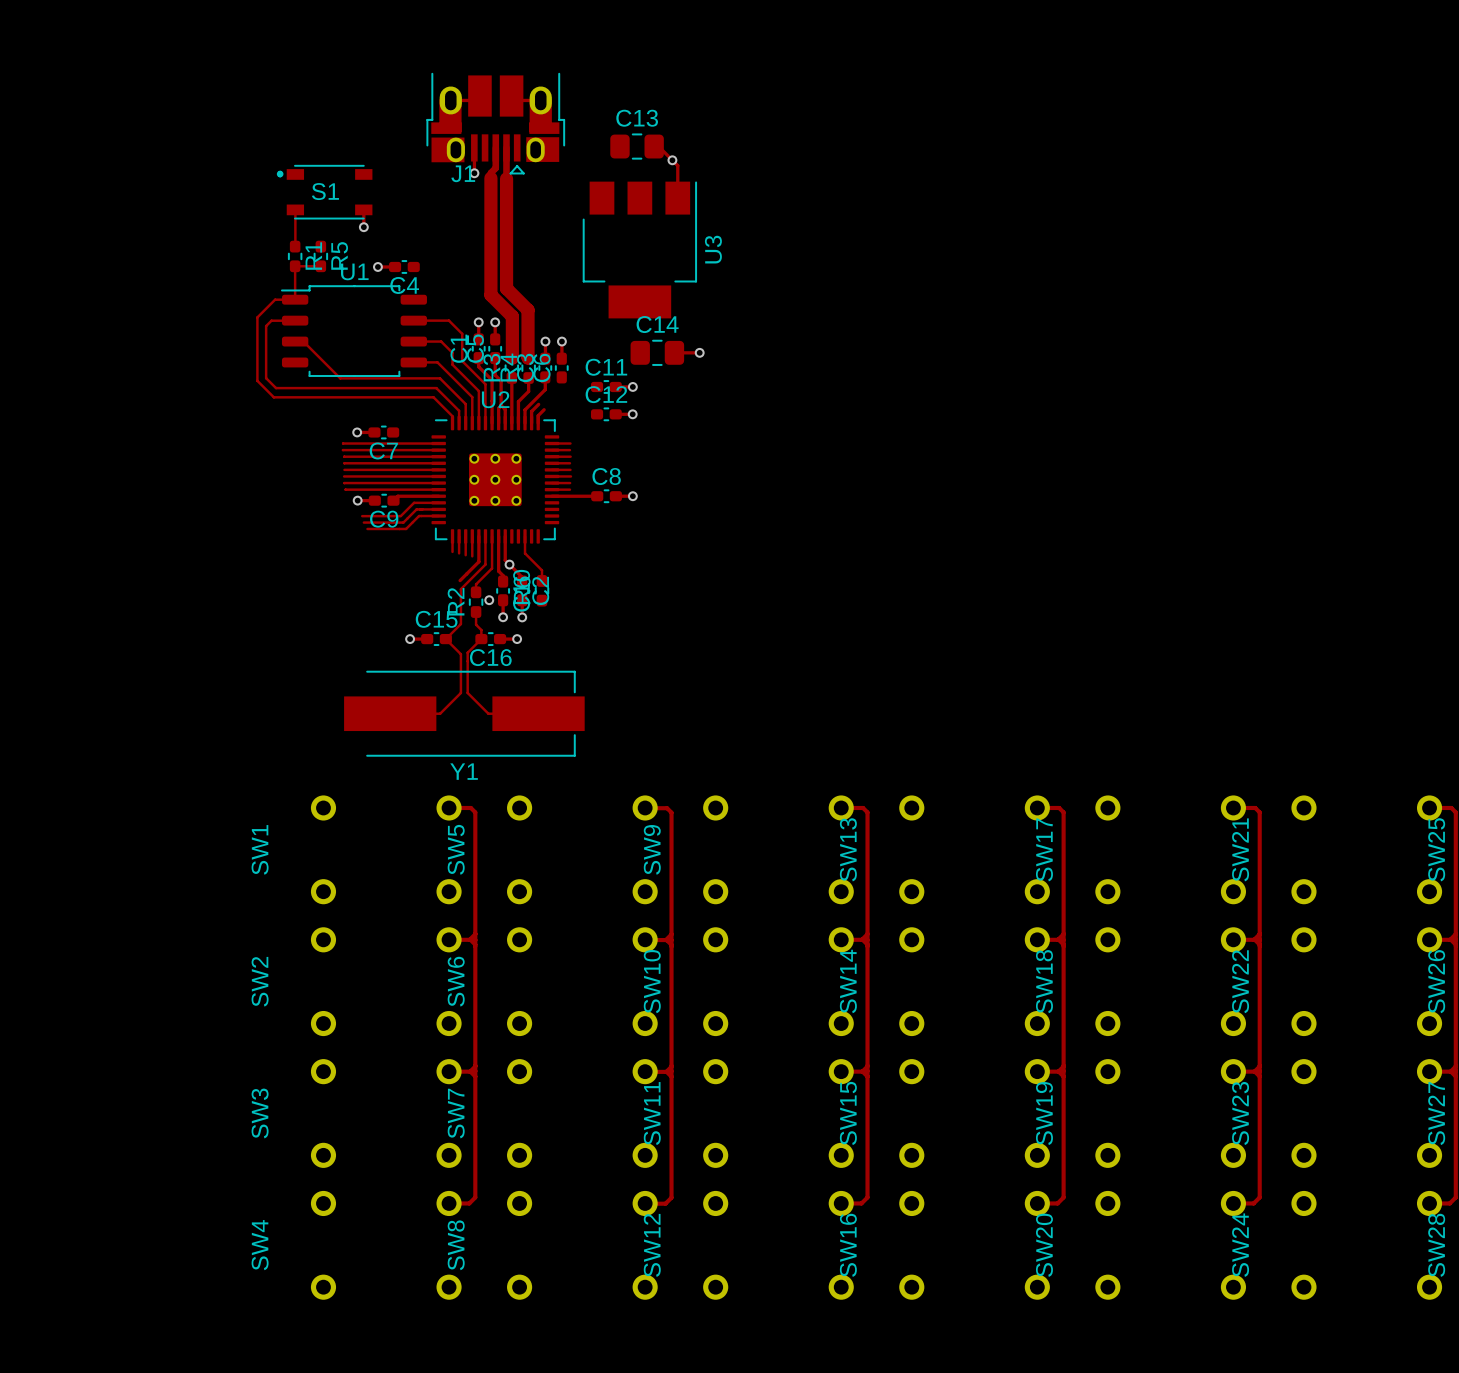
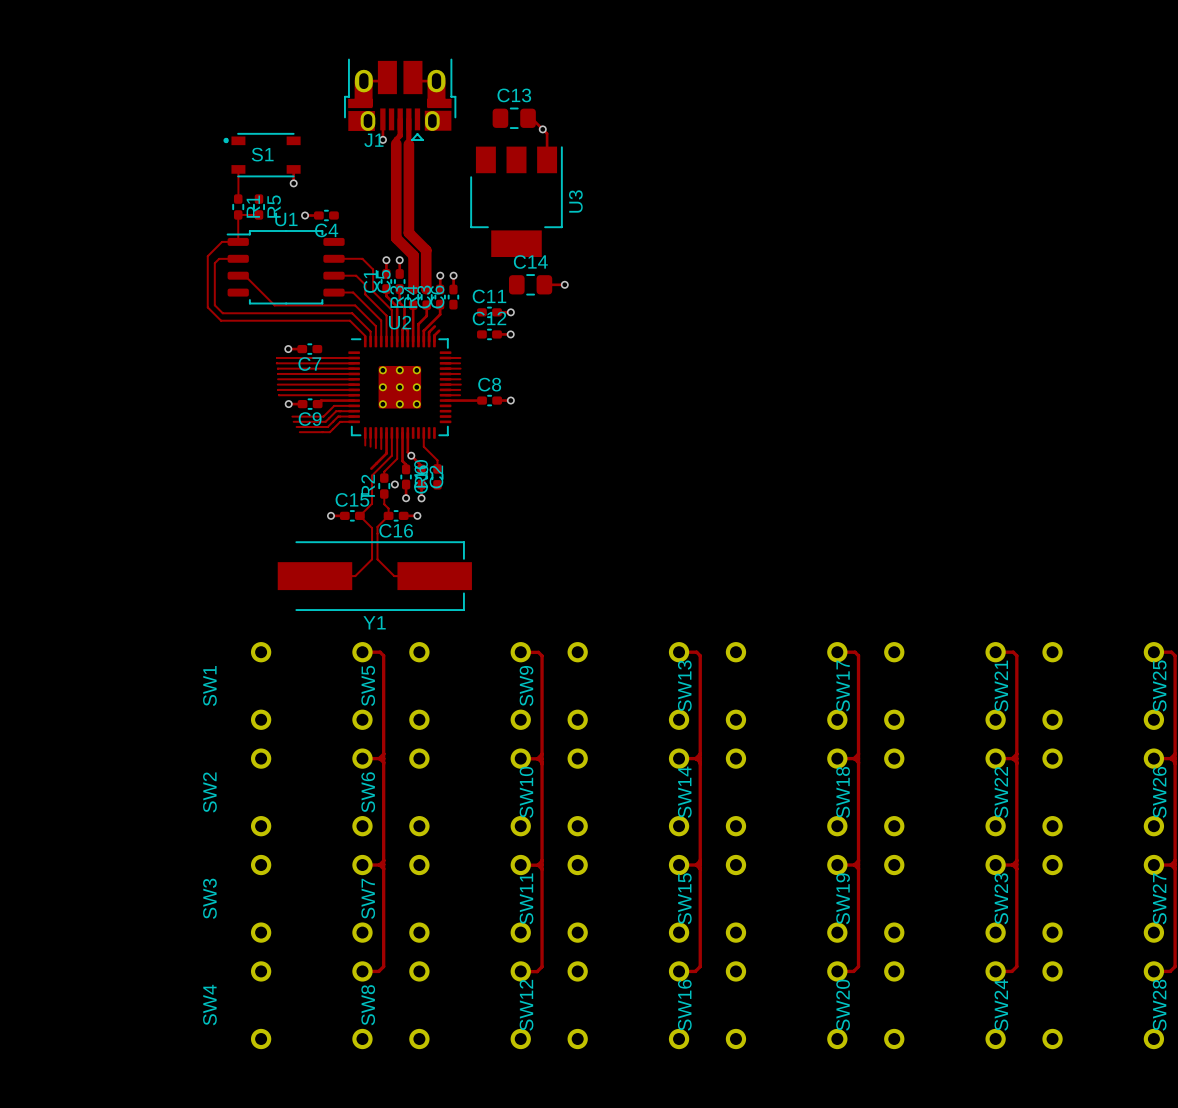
track: none -> (354, 421) (340, 421) (329, 432) (299, 432)

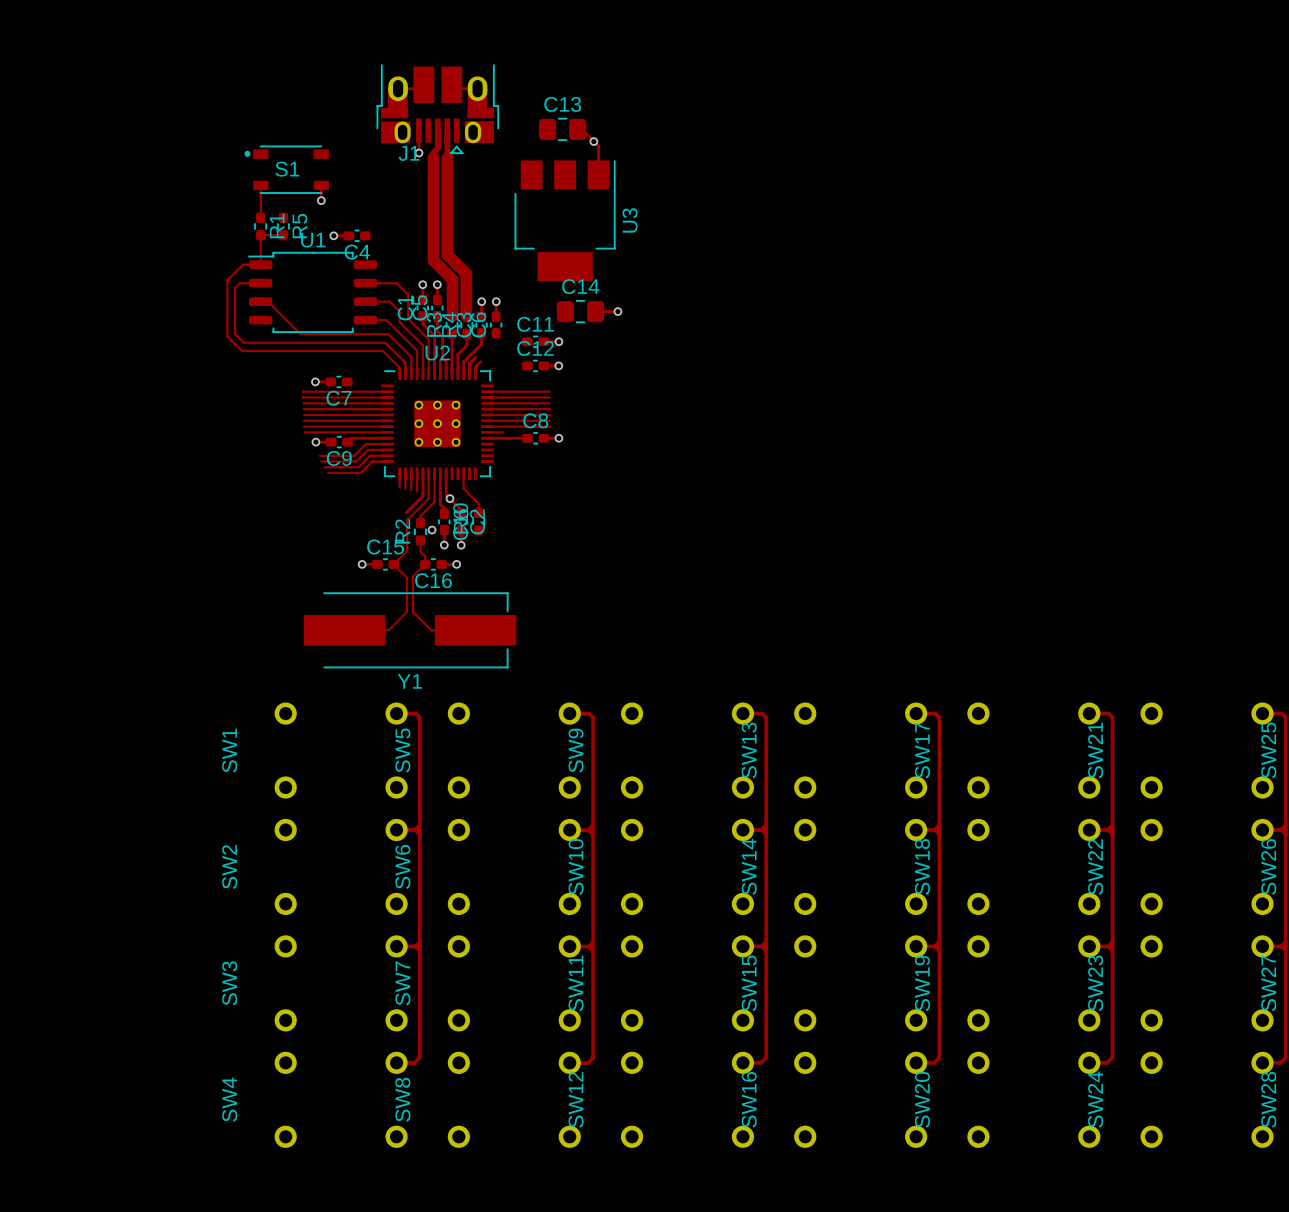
track: none -> (503, 391) (549, 391)
track: none -> (503, 397) (549, 397)
track: none -> (503, 403) (549, 403)
track: none -> (503, 409) (549, 409)
track: none -> (503, 414) (549, 414)
track: none -> (504, 420) (549, 420)
track: none -> (503, 426) (549, 426)

